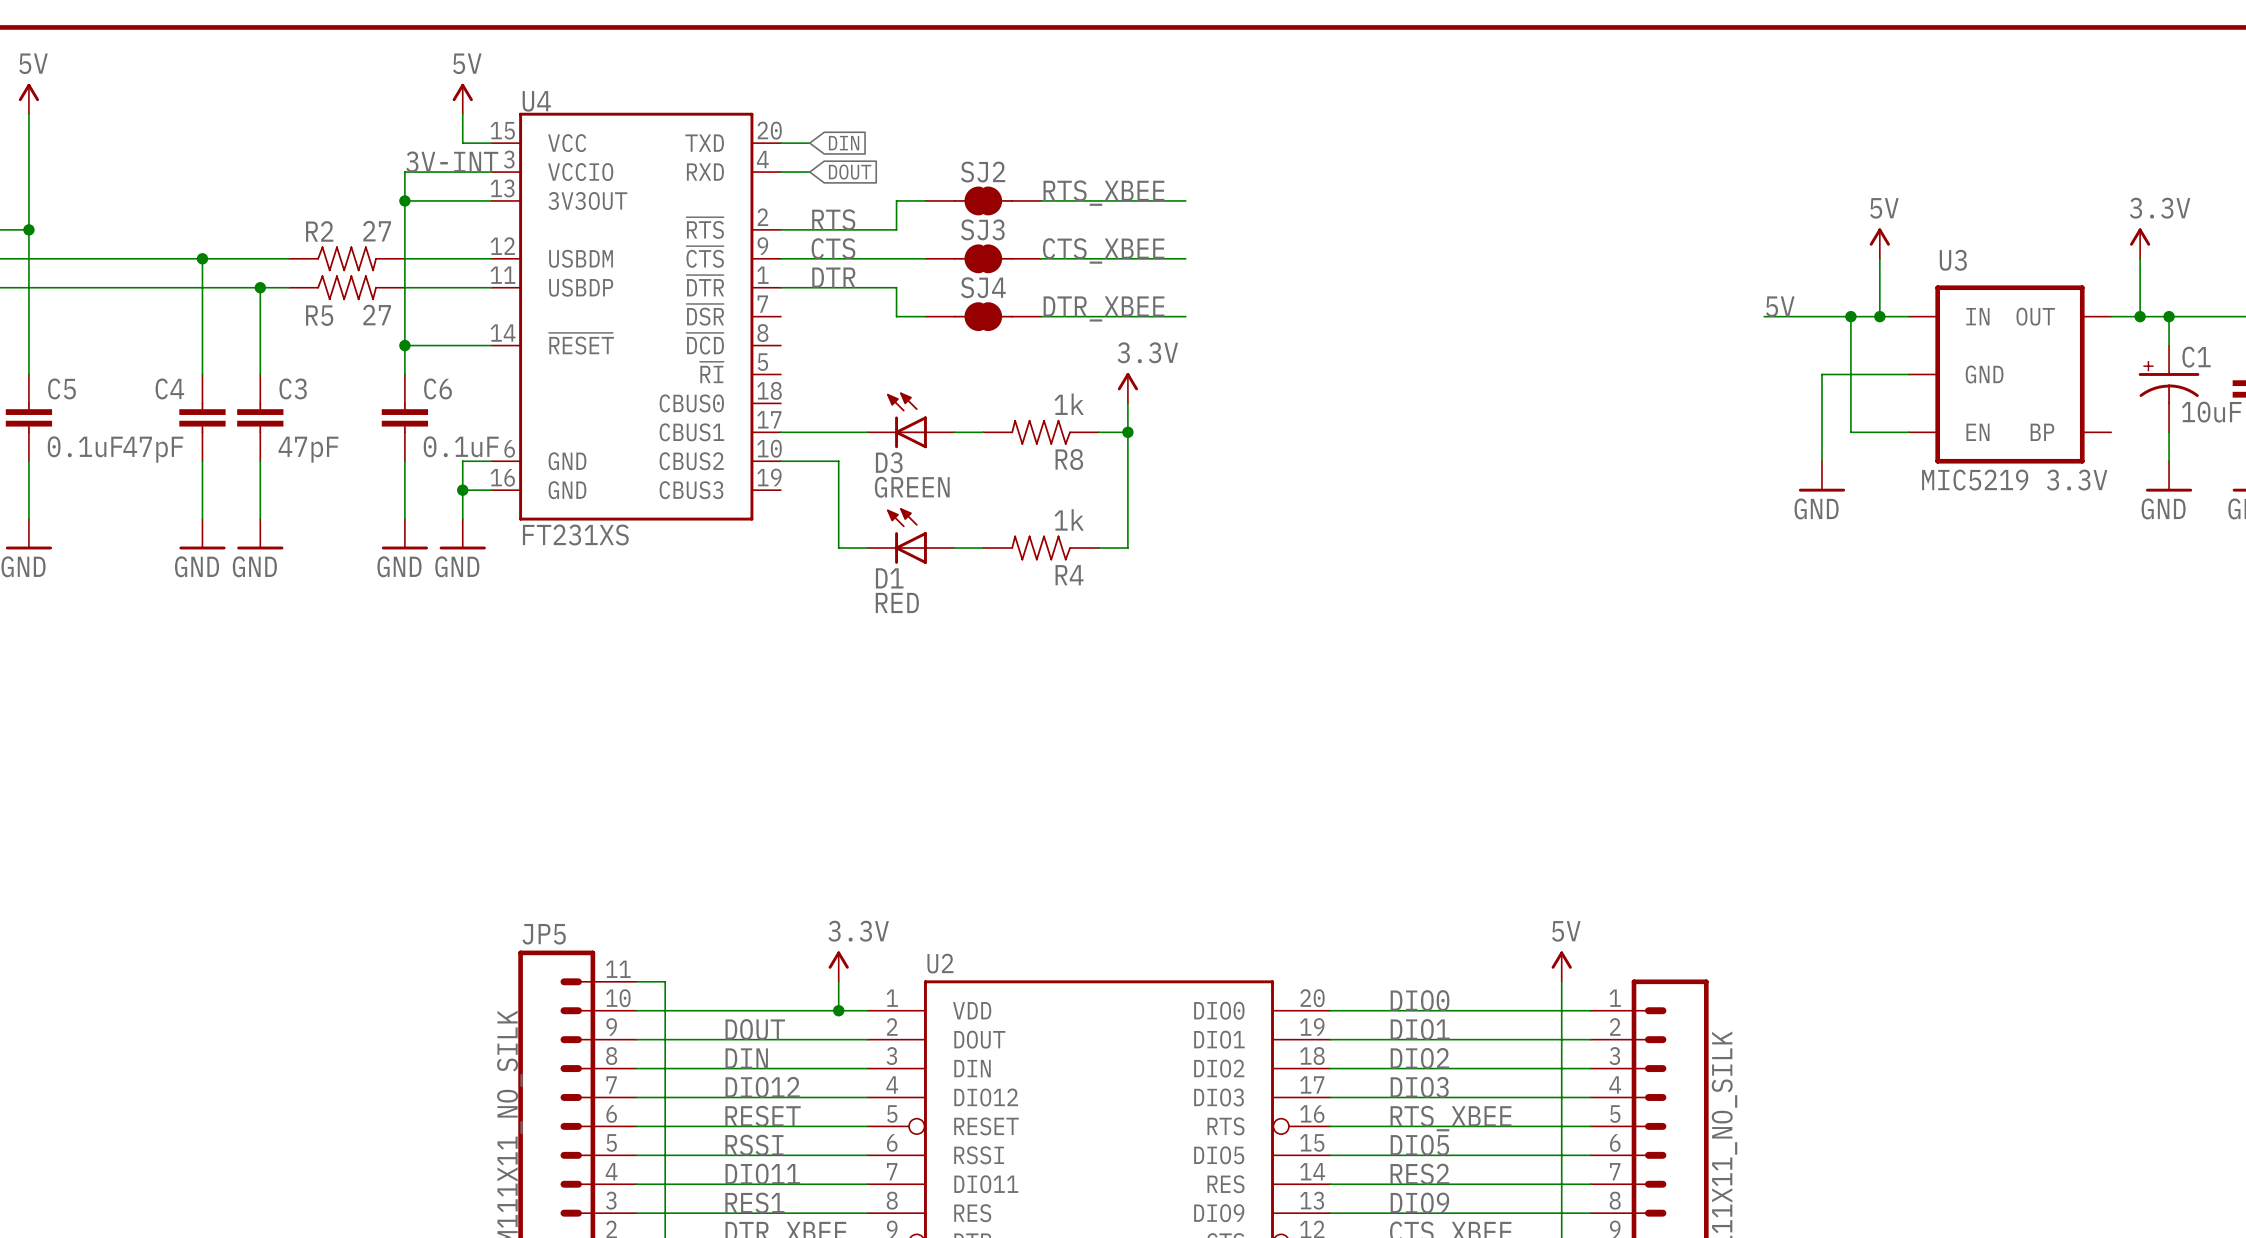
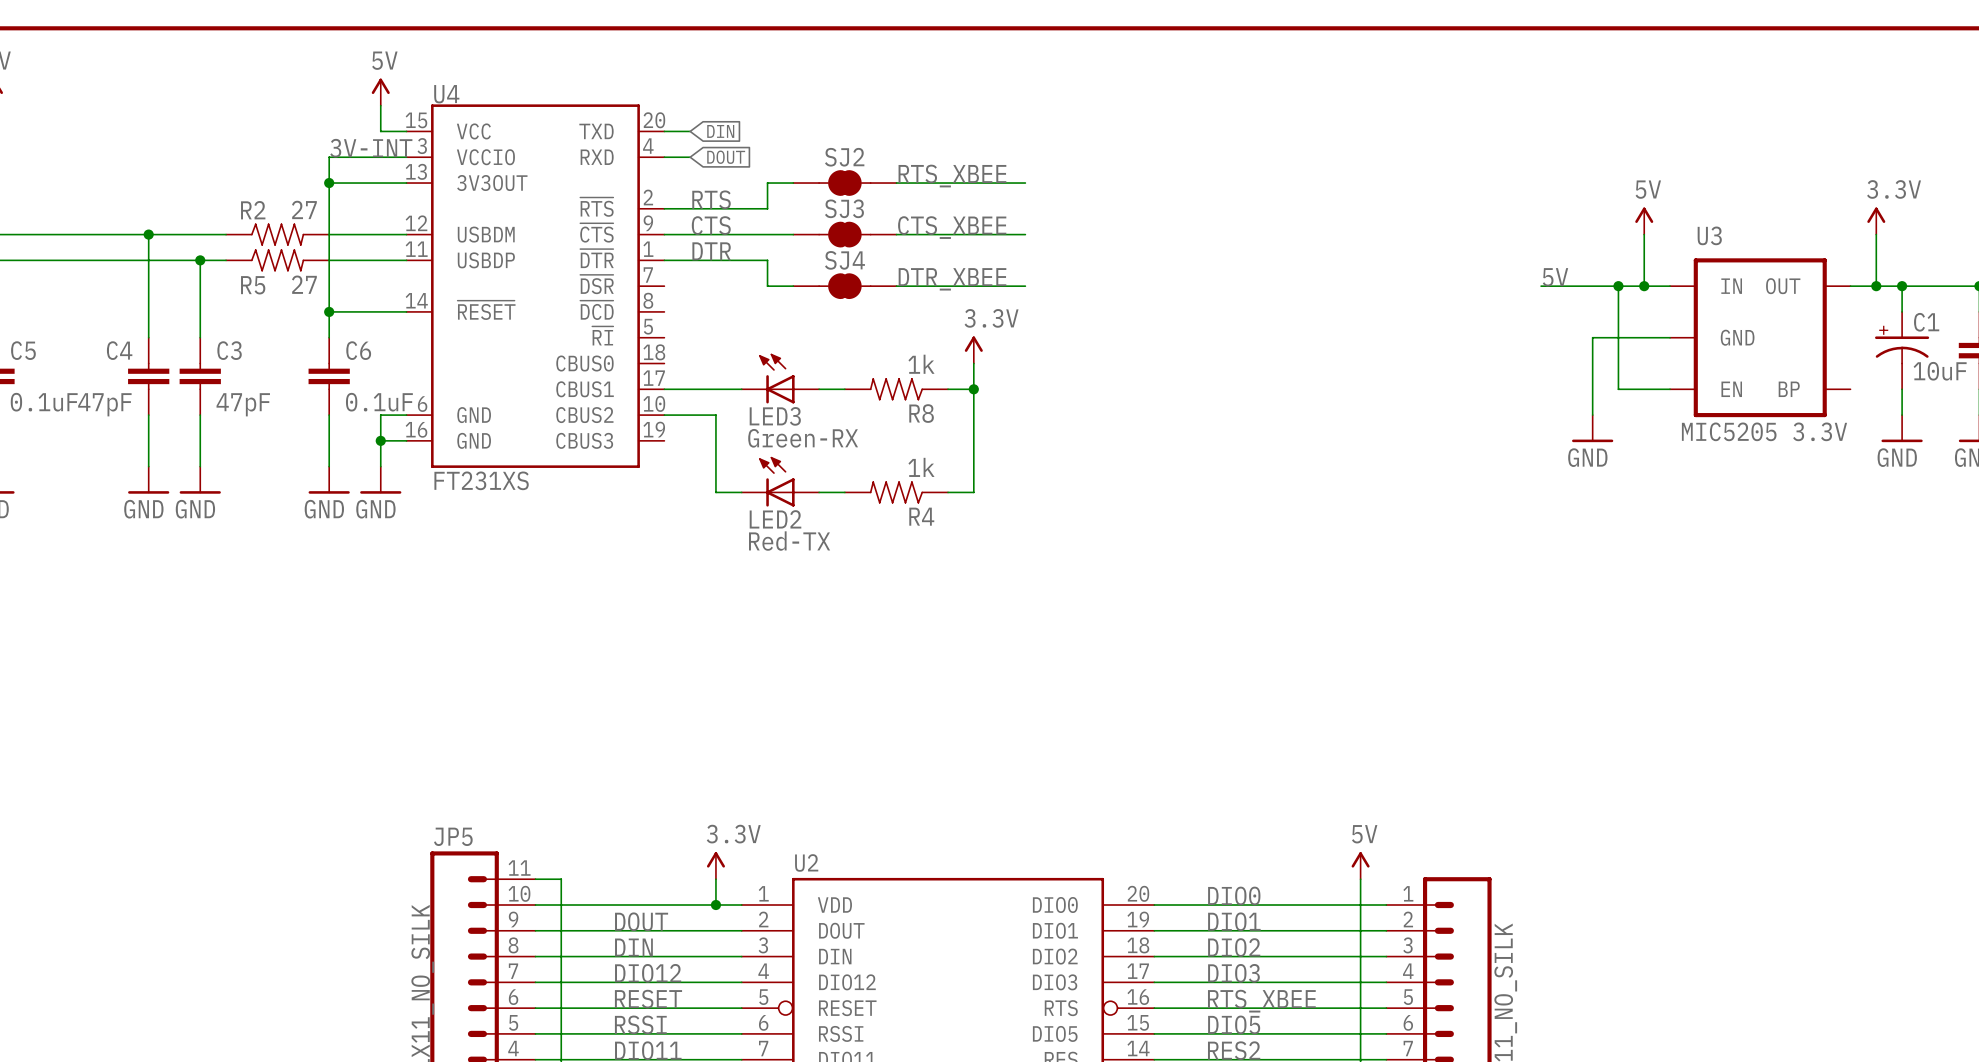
D3 name: D3 (889, 462) -> LED3 (775, 416)
U3 value: MIC5219 3.3V (2014, 480) -> MIC5205 3.3V (1764, 431)
D3 value: GREEN (912, 487) -> Green-RX (803, 438)
D1 name: D1 (889, 578) -> LED2 (775, 519)
D1 value: RED (897, 602) -> Red-TX (789, 541)

